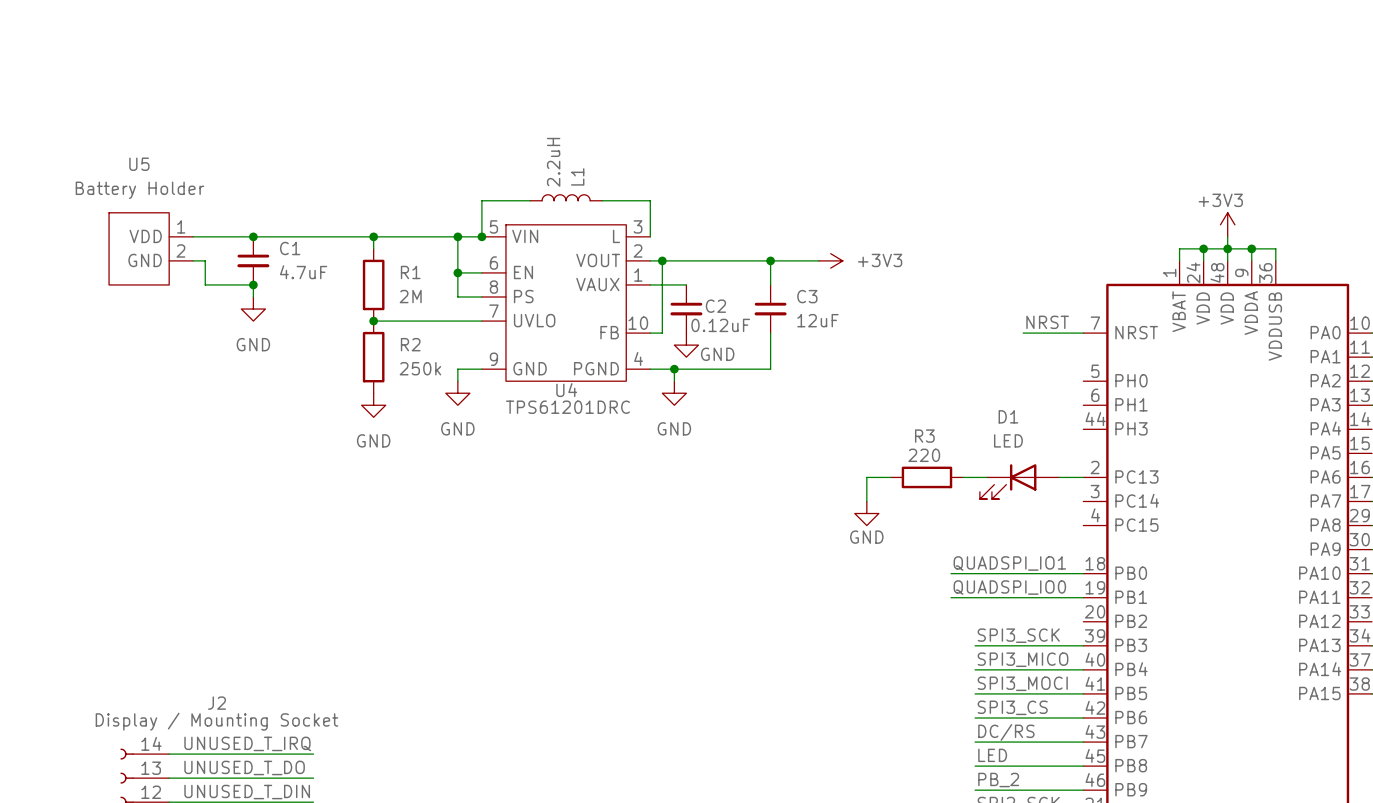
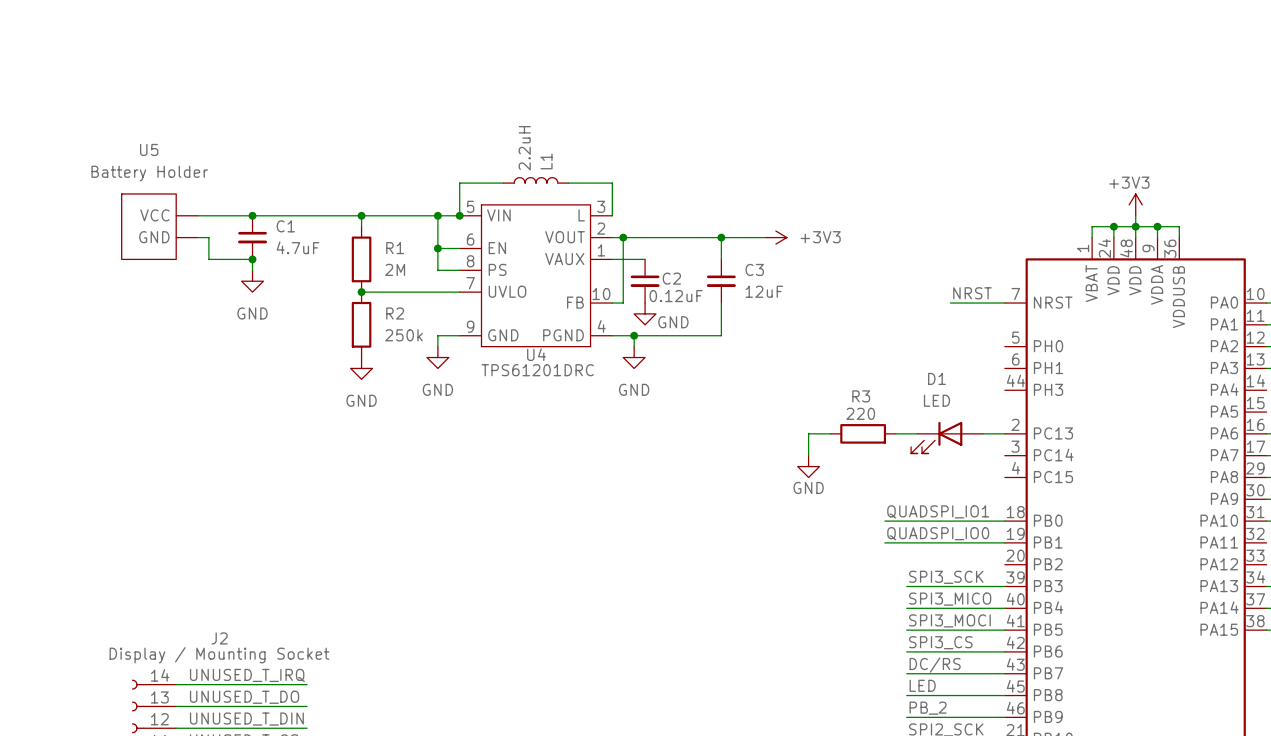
U5 pin number: 1 (181, 226) -> none
U5 pin name: VDD (145, 236) -> VCC (154, 215)
U5 pin number: 2 (180, 250) -> none

